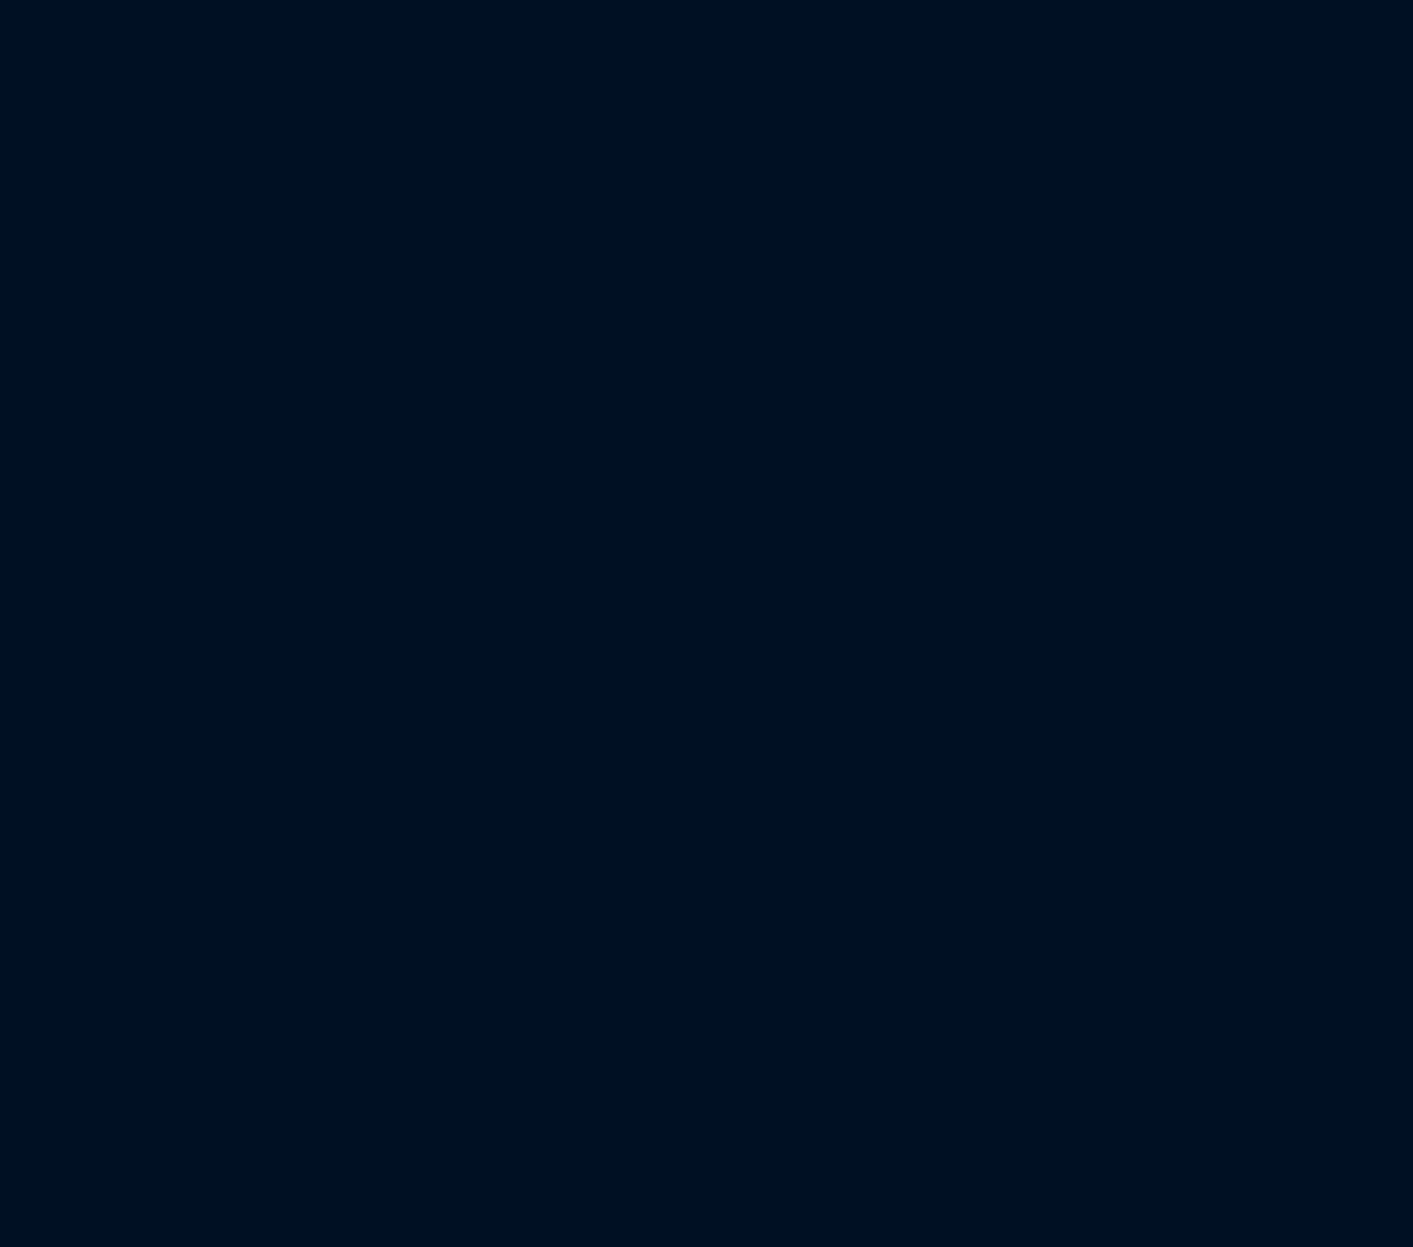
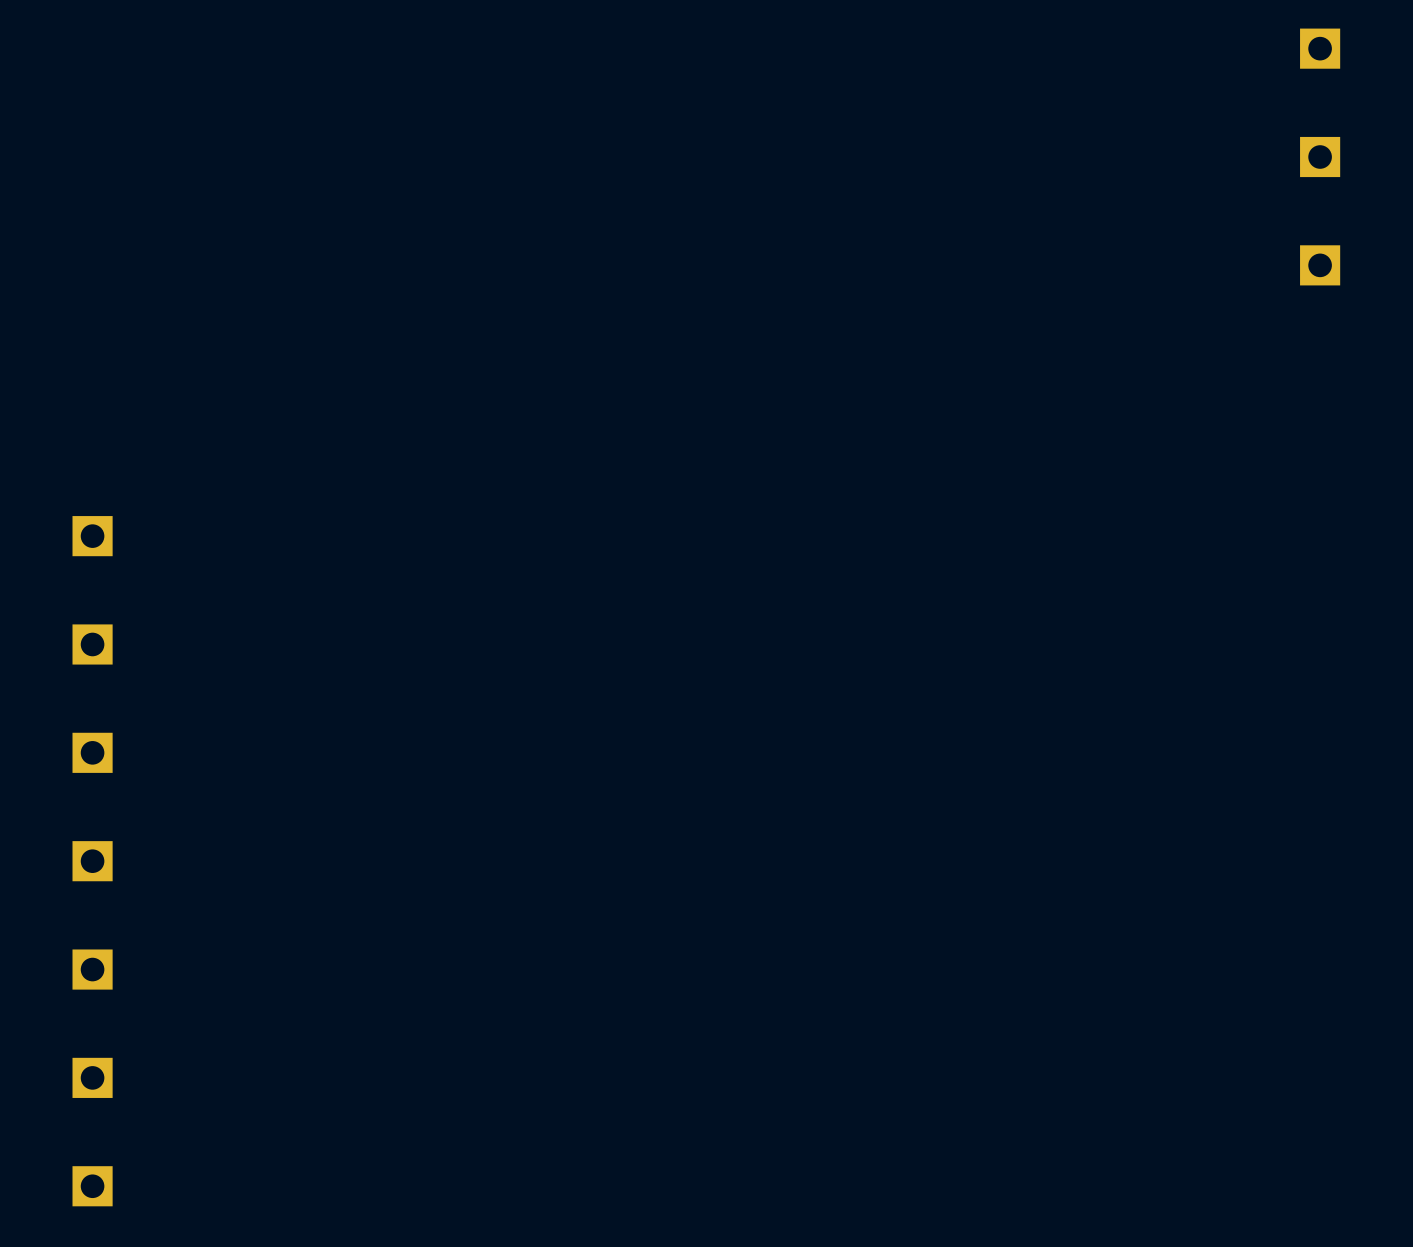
part: none -> (1320, 48)
part: none -> (1320, 157)
part: none -> (1320, 265)
part: none -> (92, 536)
part: none -> (92, 644)
part: none -> (92, 752)
part: none -> (92, 861)
part: none -> (92, 969)
part: none -> (92, 1077)
part: none -> (92, 1186)

